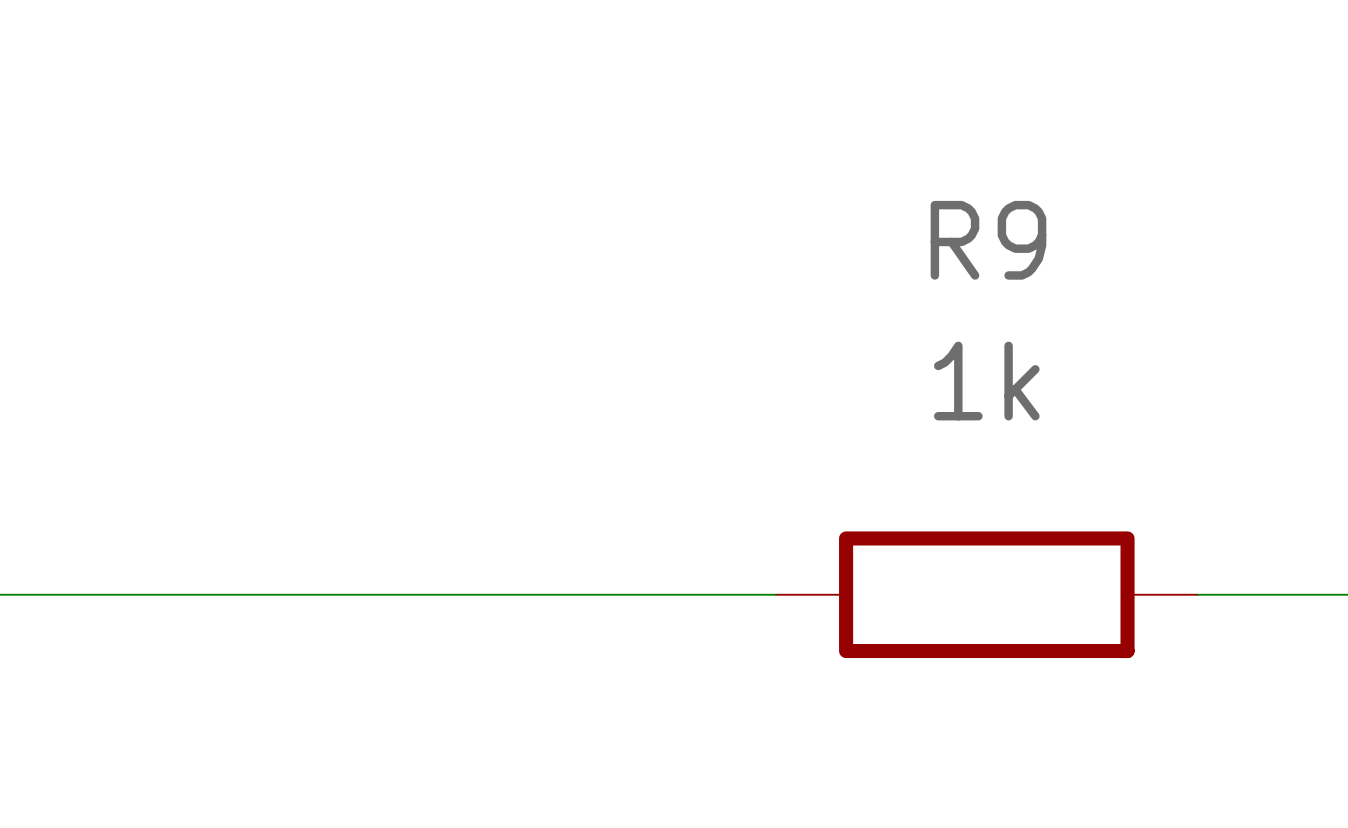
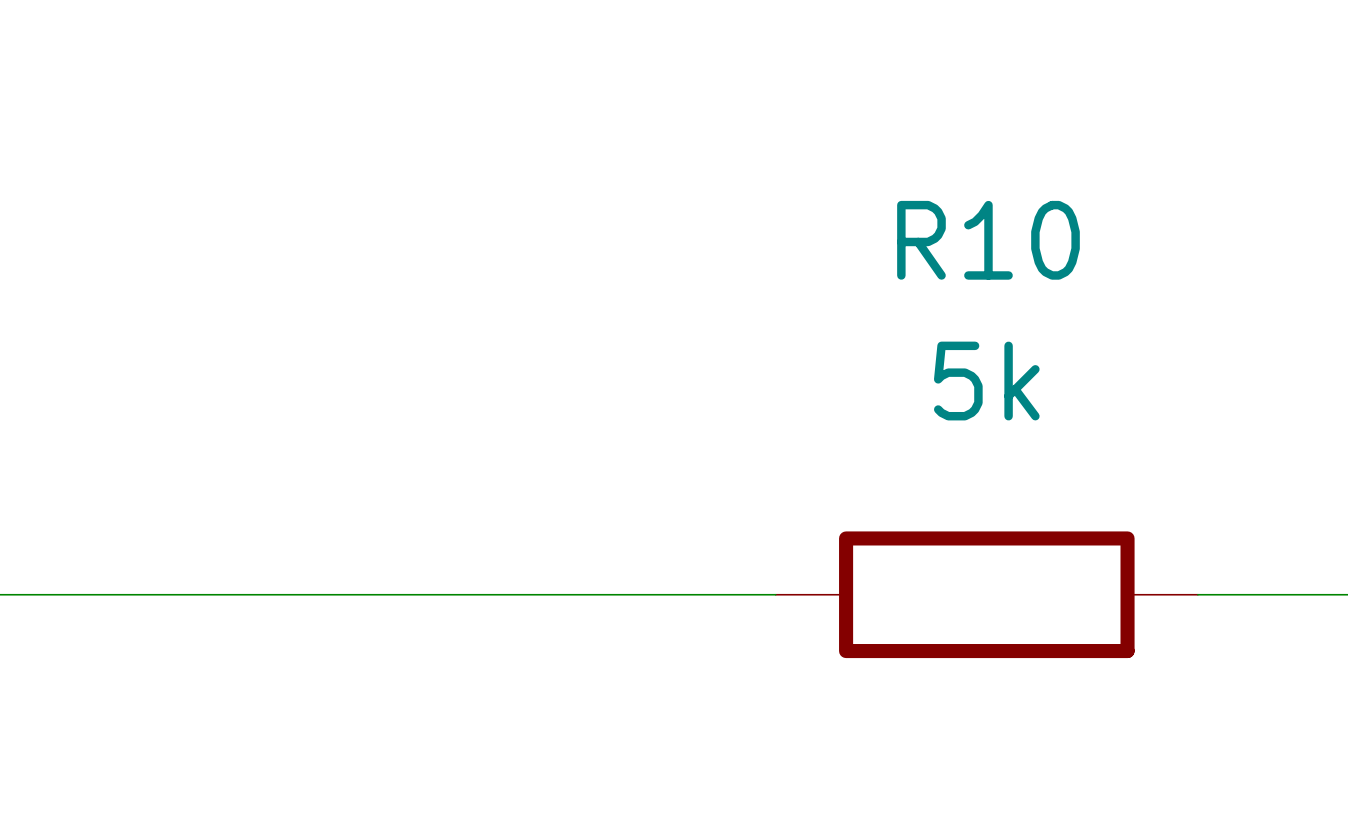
R9 name: R9 (988, 240) -> R10 (988, 240)
R9 value: 1k (986, 381) -> 5k (986, 381)

